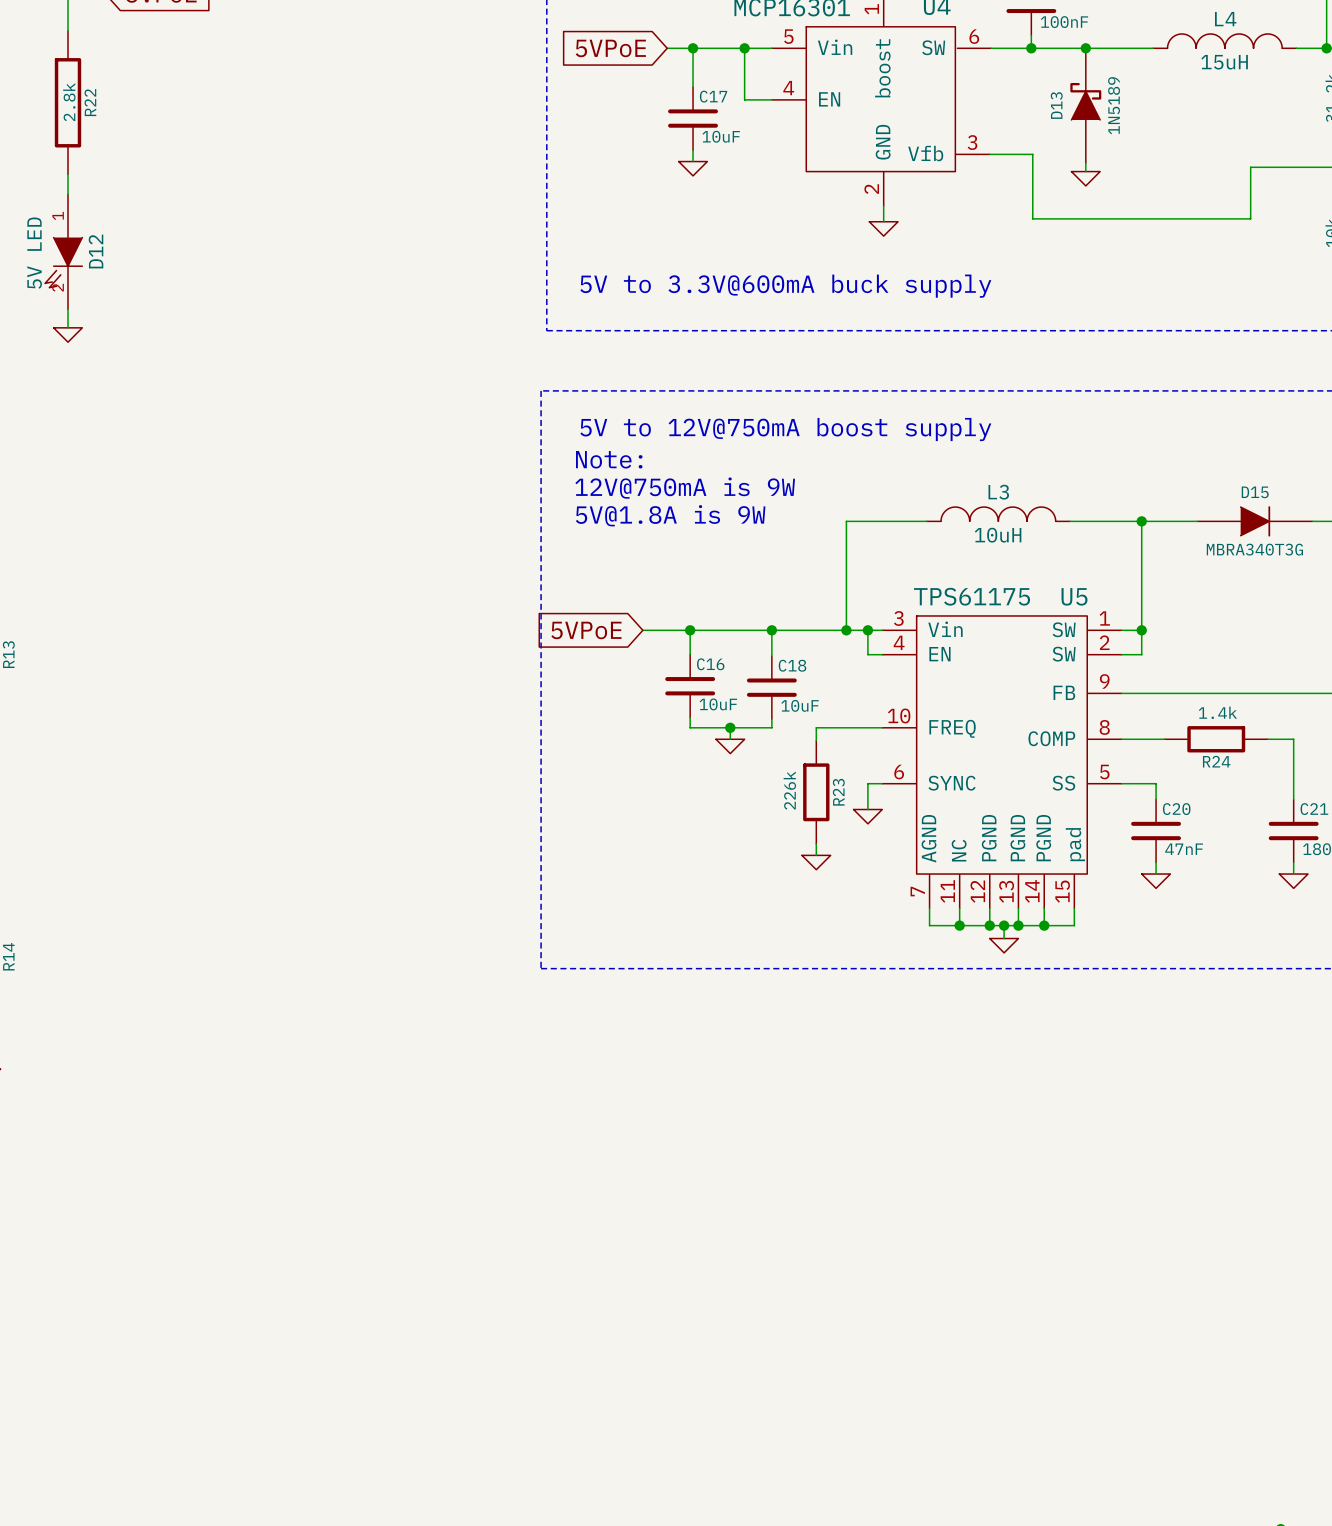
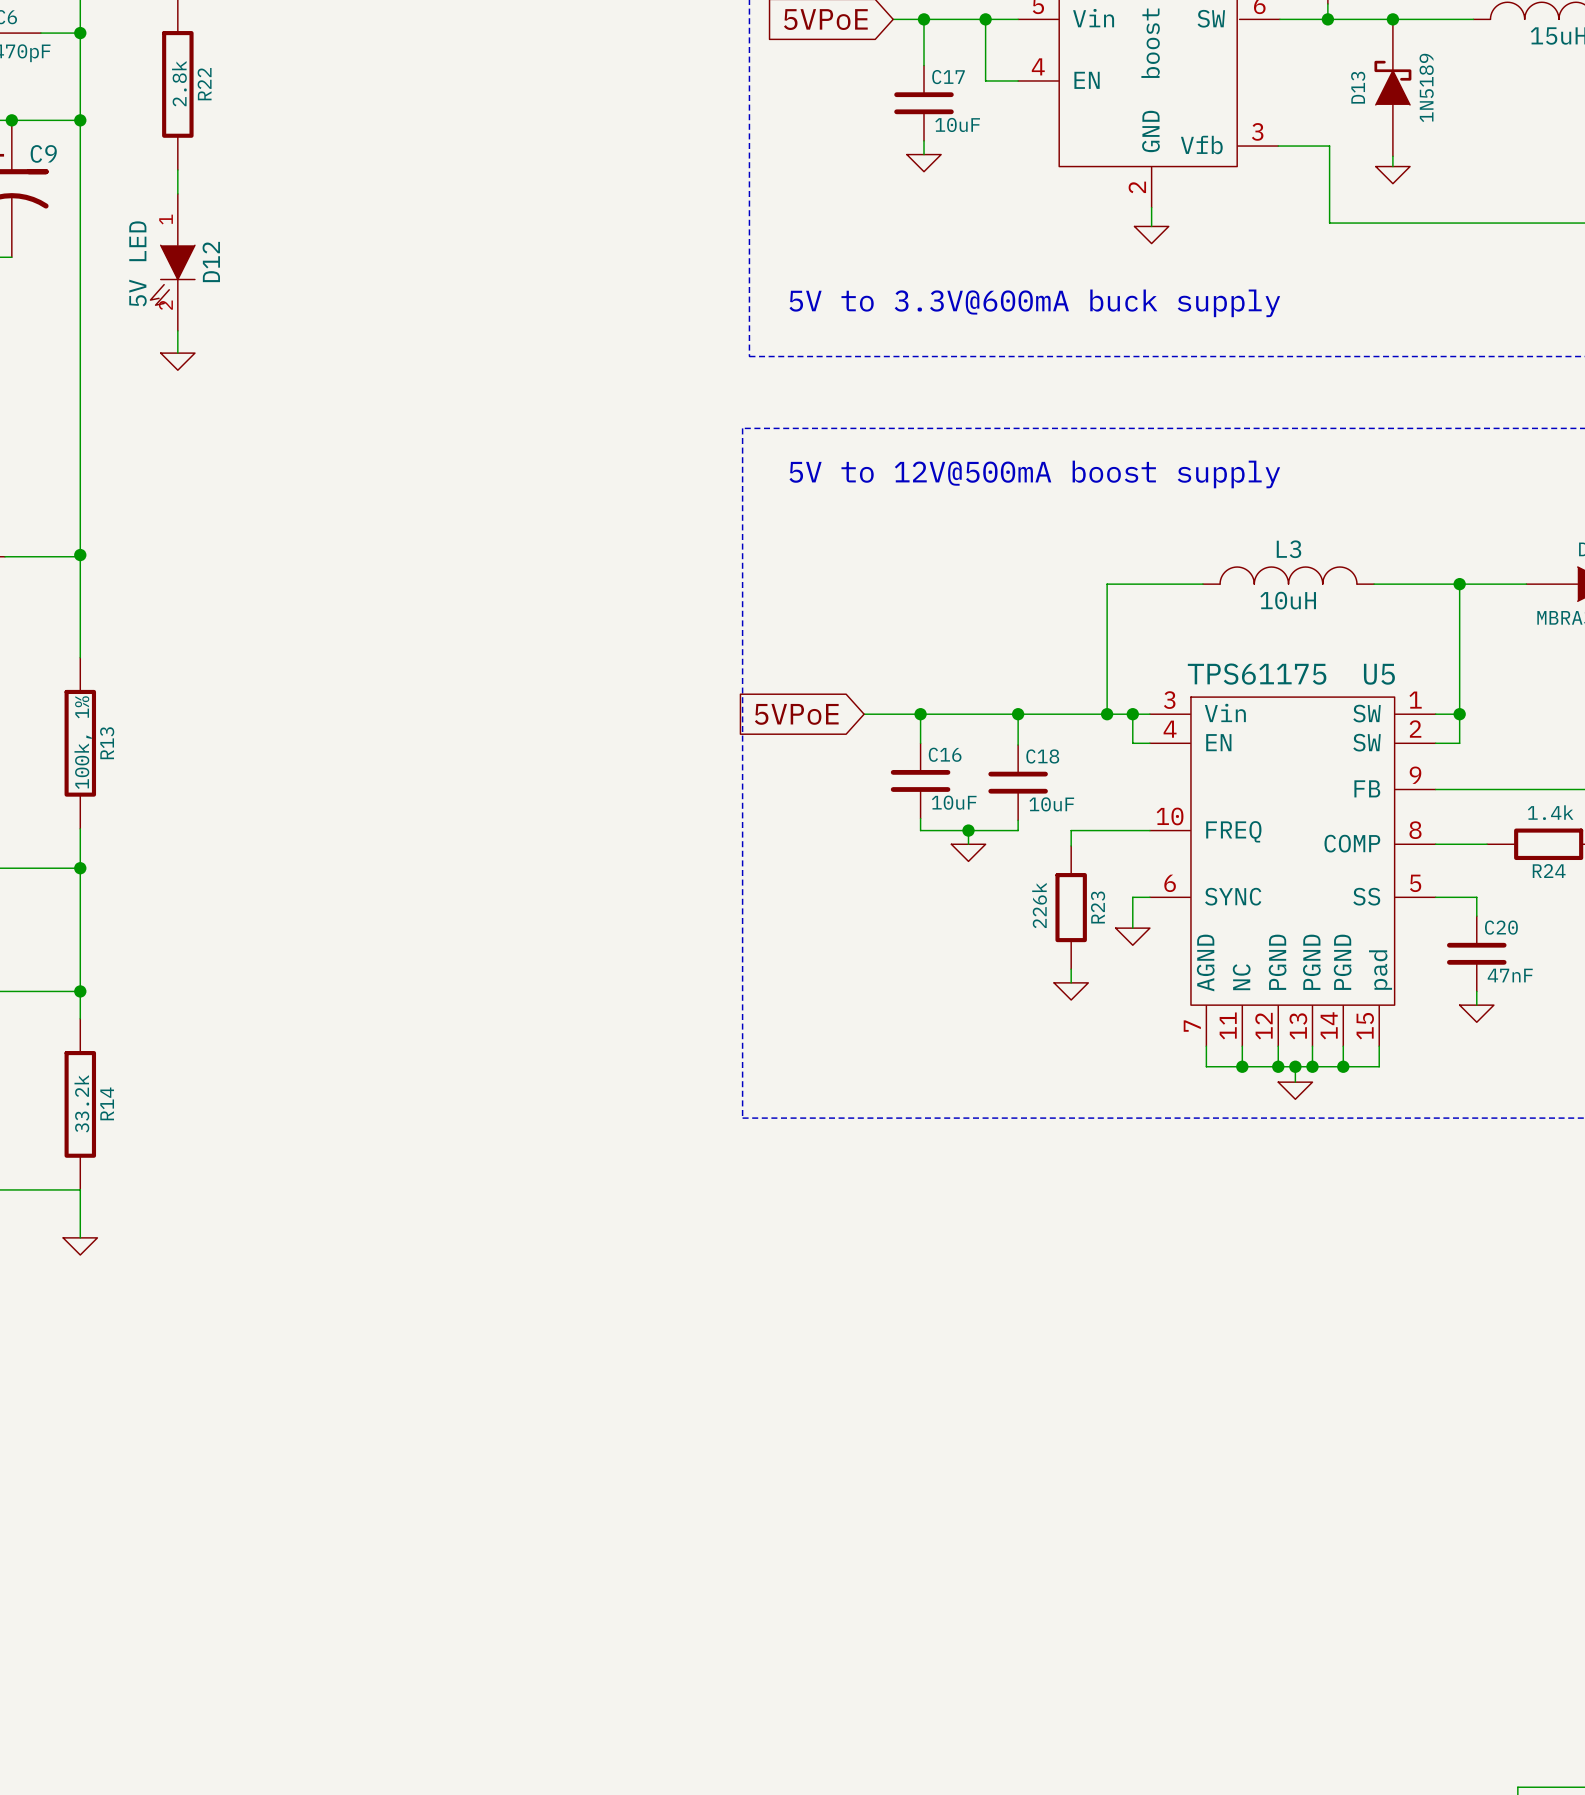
text: 5V to 12V@750mA boost supply (785, 429) -> 5V to 12V@500mA boost supply (1034, 474)
text: Note: (609, 459) -> none
text: 12V@750mA is 9W (685, 488) -> none
text: 5V@1.8A is 9W (670, 515) -> none

